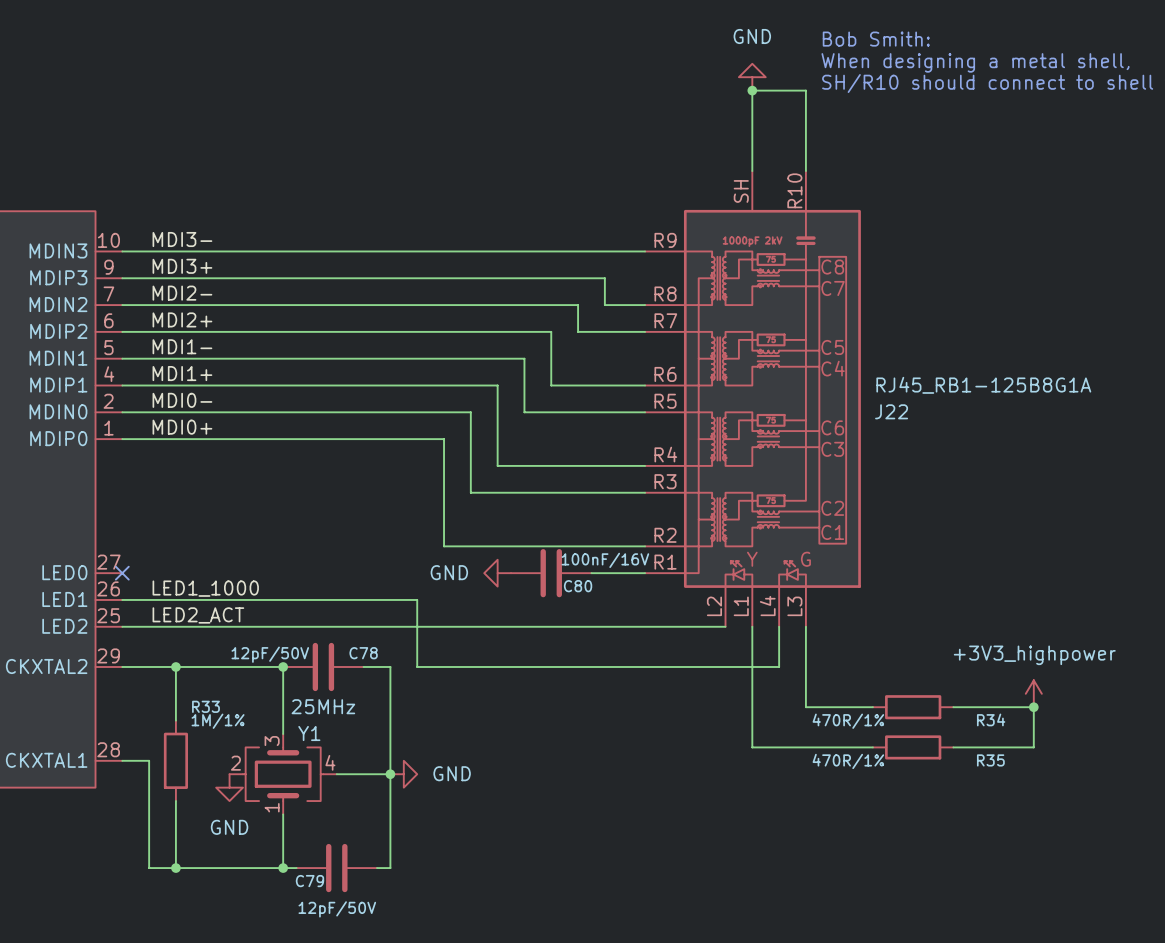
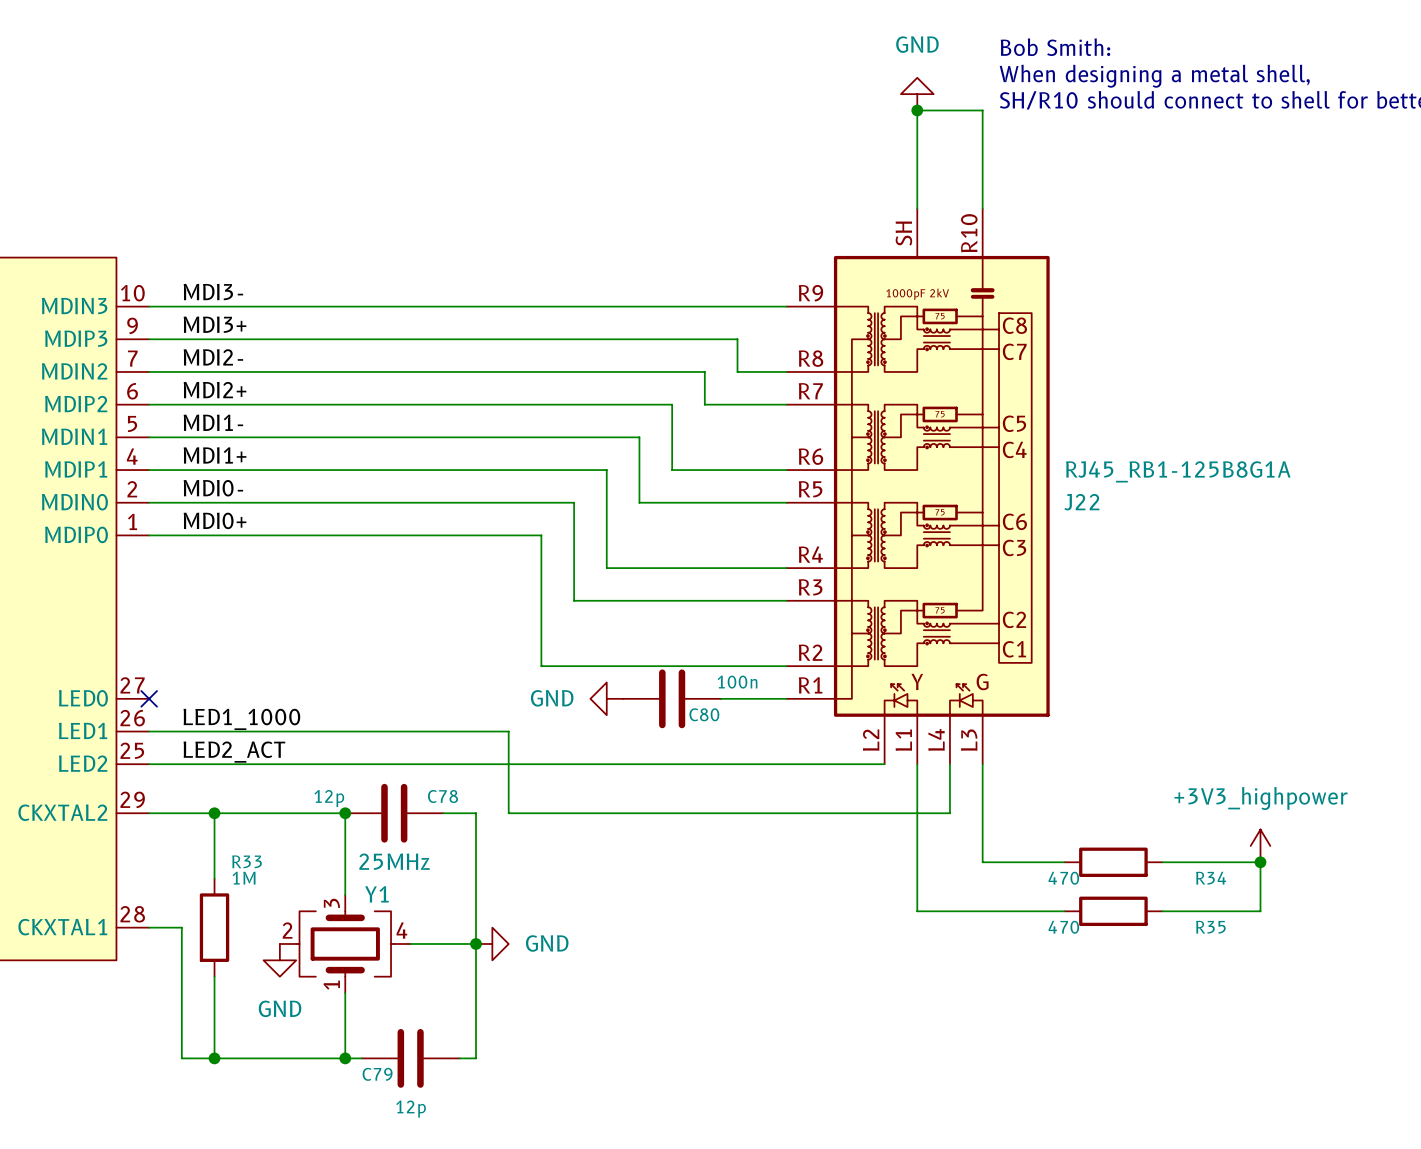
C80 value: 100nF/16V (605, 560) -> 100n (737, 682)
C78 value: 12pF/50V (270, 654) -> 12p (329, 798)
R33 value: 1M/1% (218, 721) -> 1M (244, 878)
R34 value: 470R/1% (848, 721) -> 470 (1063, 878)
R35 value: 470R/1% (848, 761) -> 470 (1063, 927)
C79 value: 12pF/50V (337, 909) -> 12p (411, 1109)

